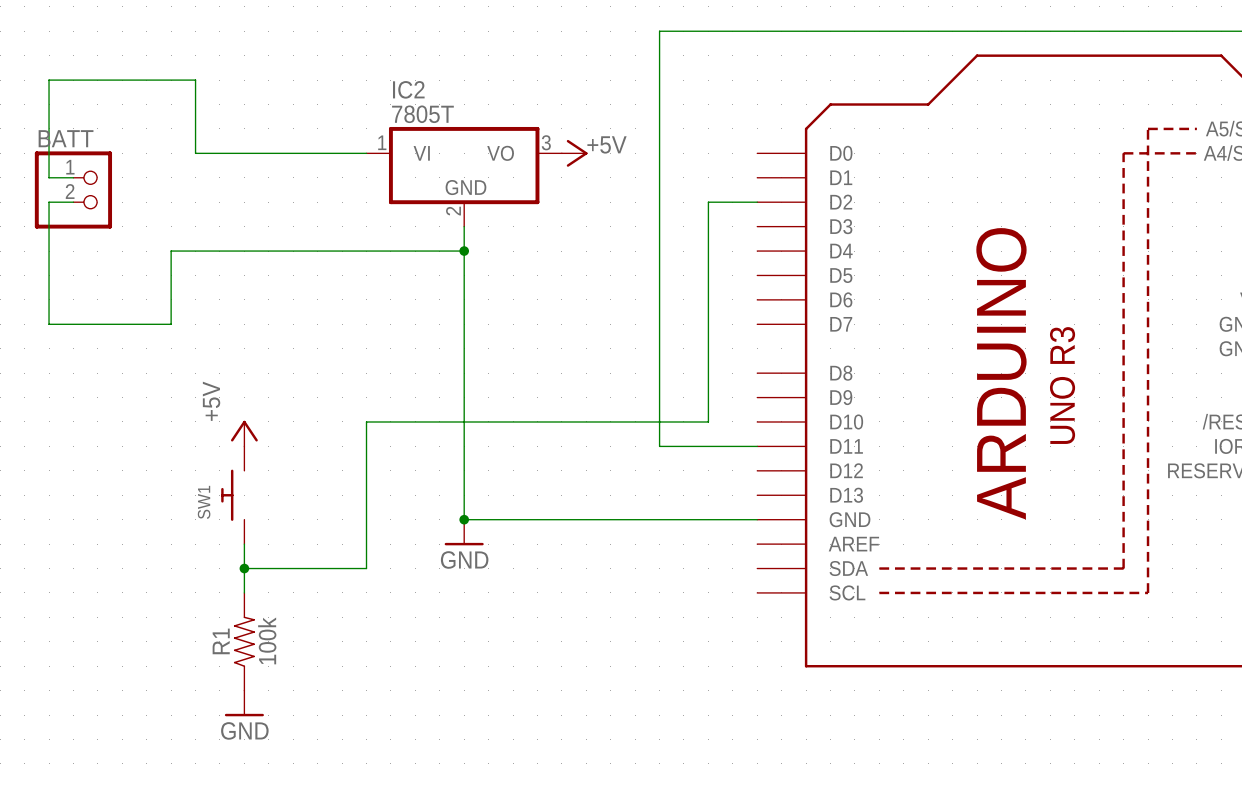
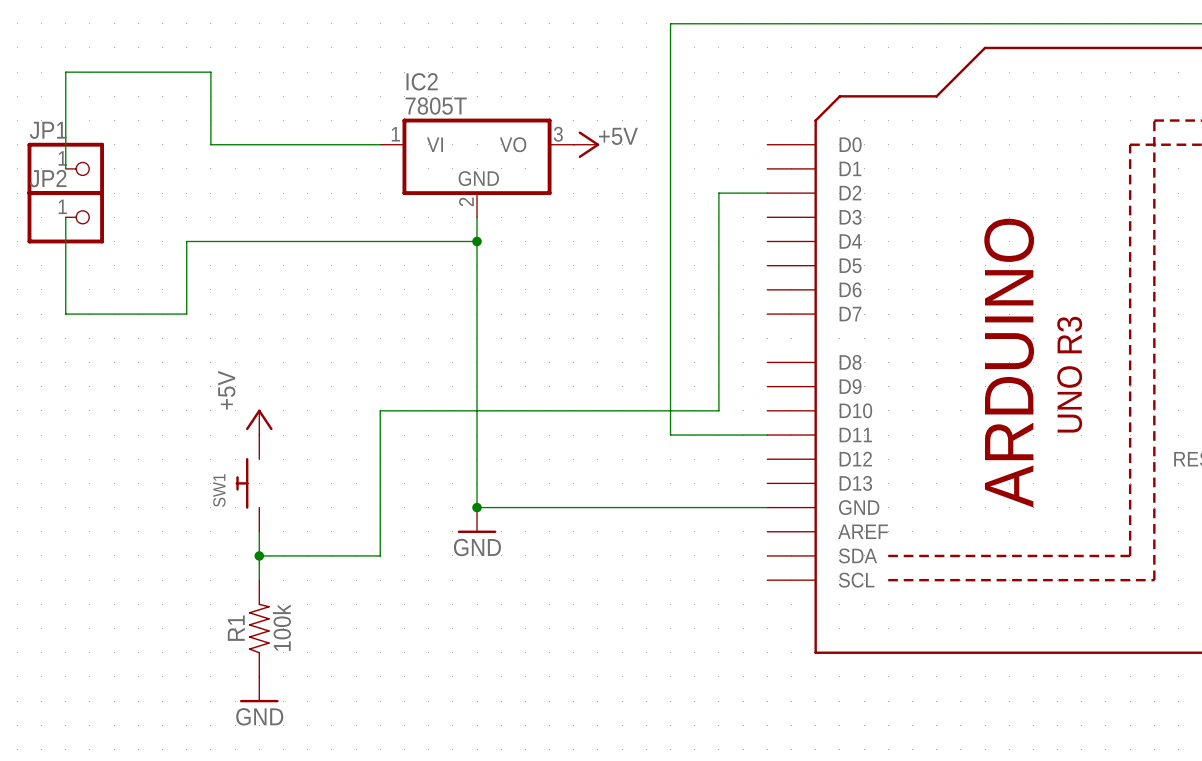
wire: (49, 177) (73, 177) -> none
JP1: none -> (65, 168)
BATT: (73, 189) -> none
JP2: none -> (65, 217)

